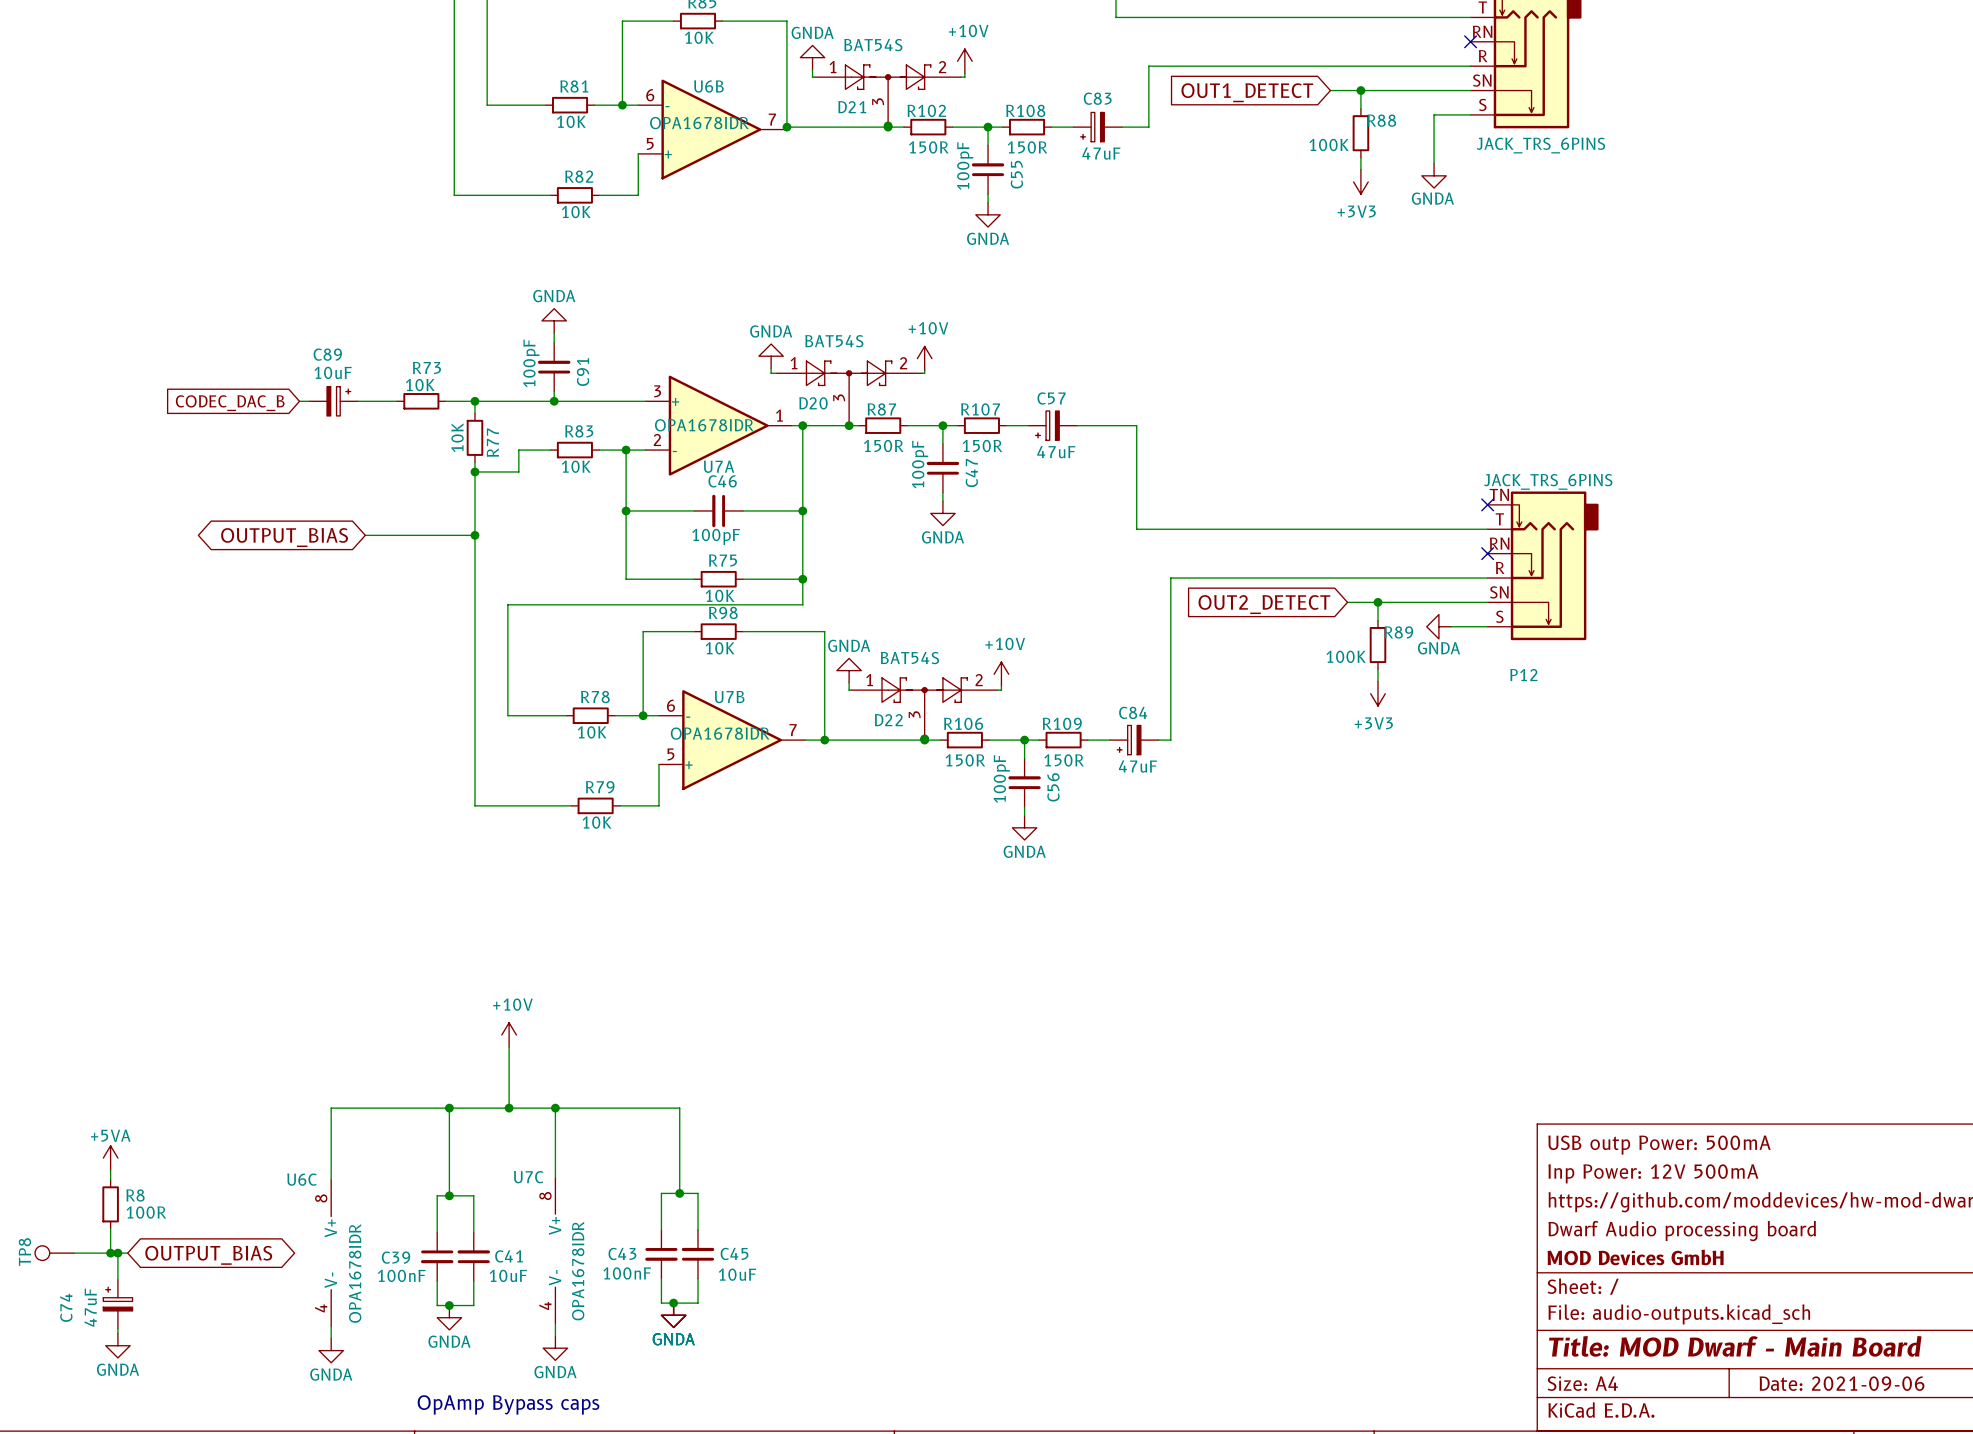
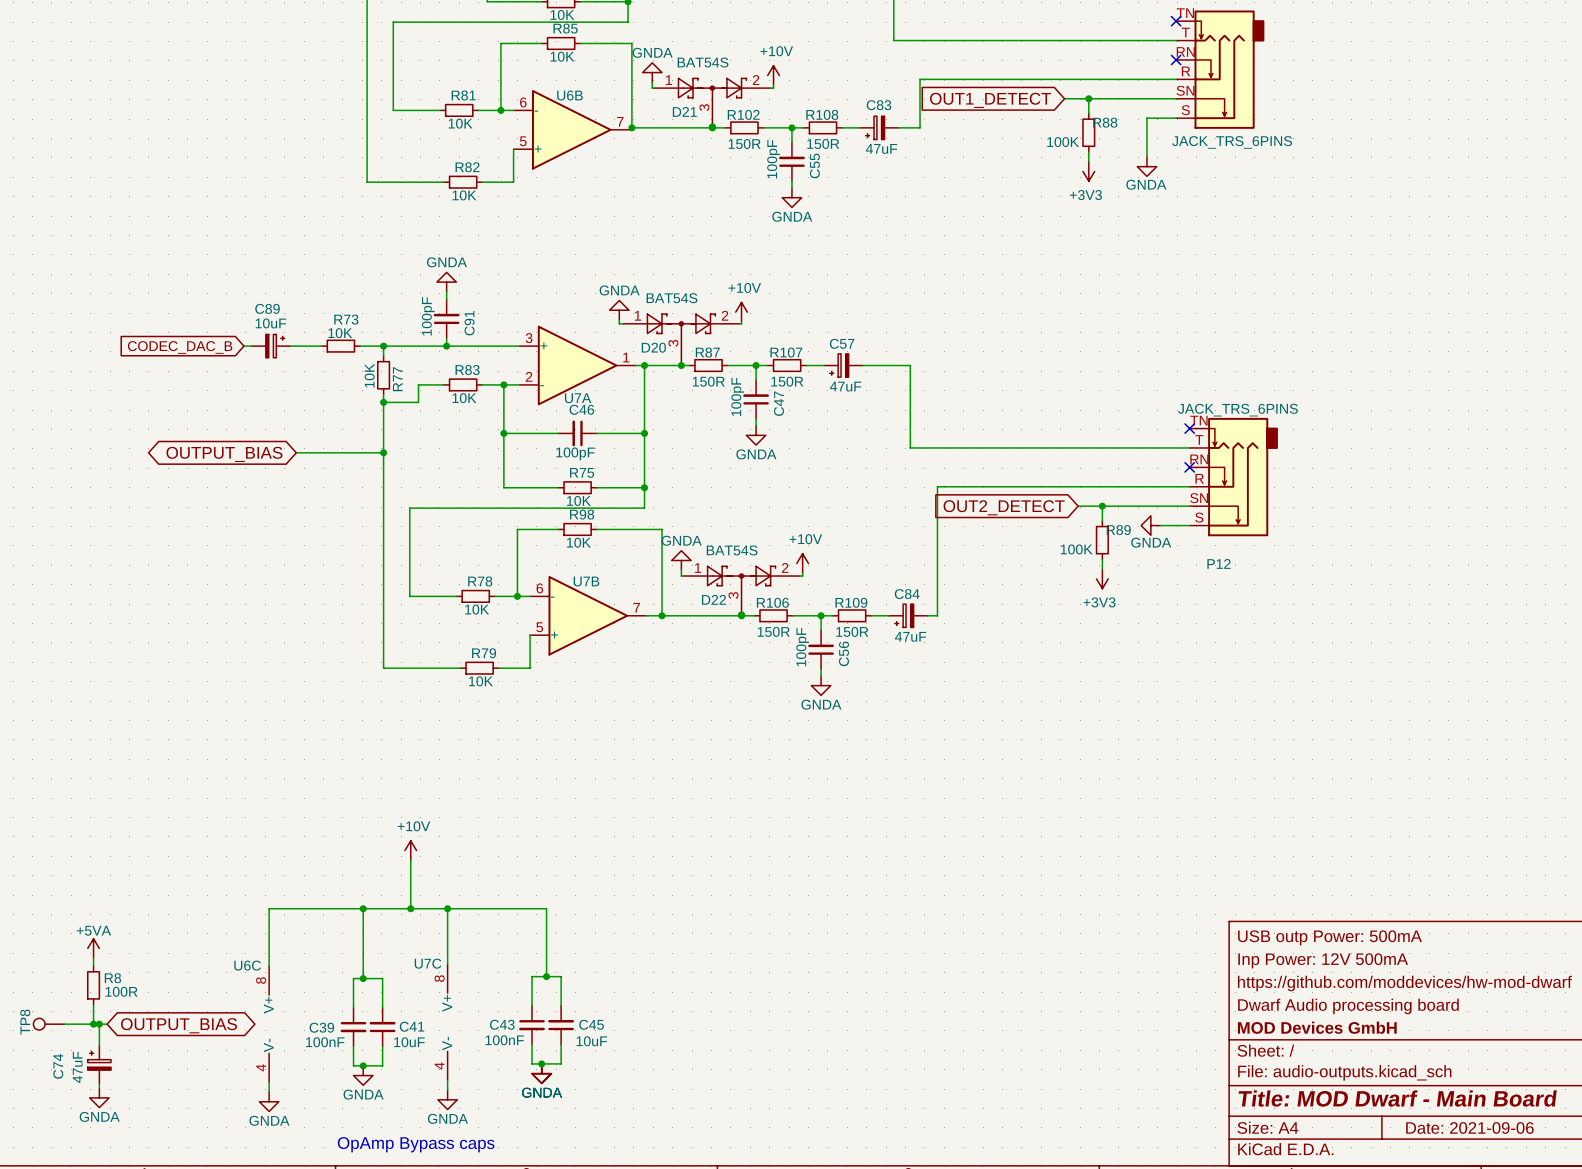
U6B value: OPA1678IDR (699, 123) -> none
U7A value: OPA1678IDR (704, 425) -> none
U7B value: OPA1678IDR (720, 733) -> none
U7C value: OPA1678IDR (578, 1271) -> none
U6C value: OPA1678IDR (355, 1273) -> none

